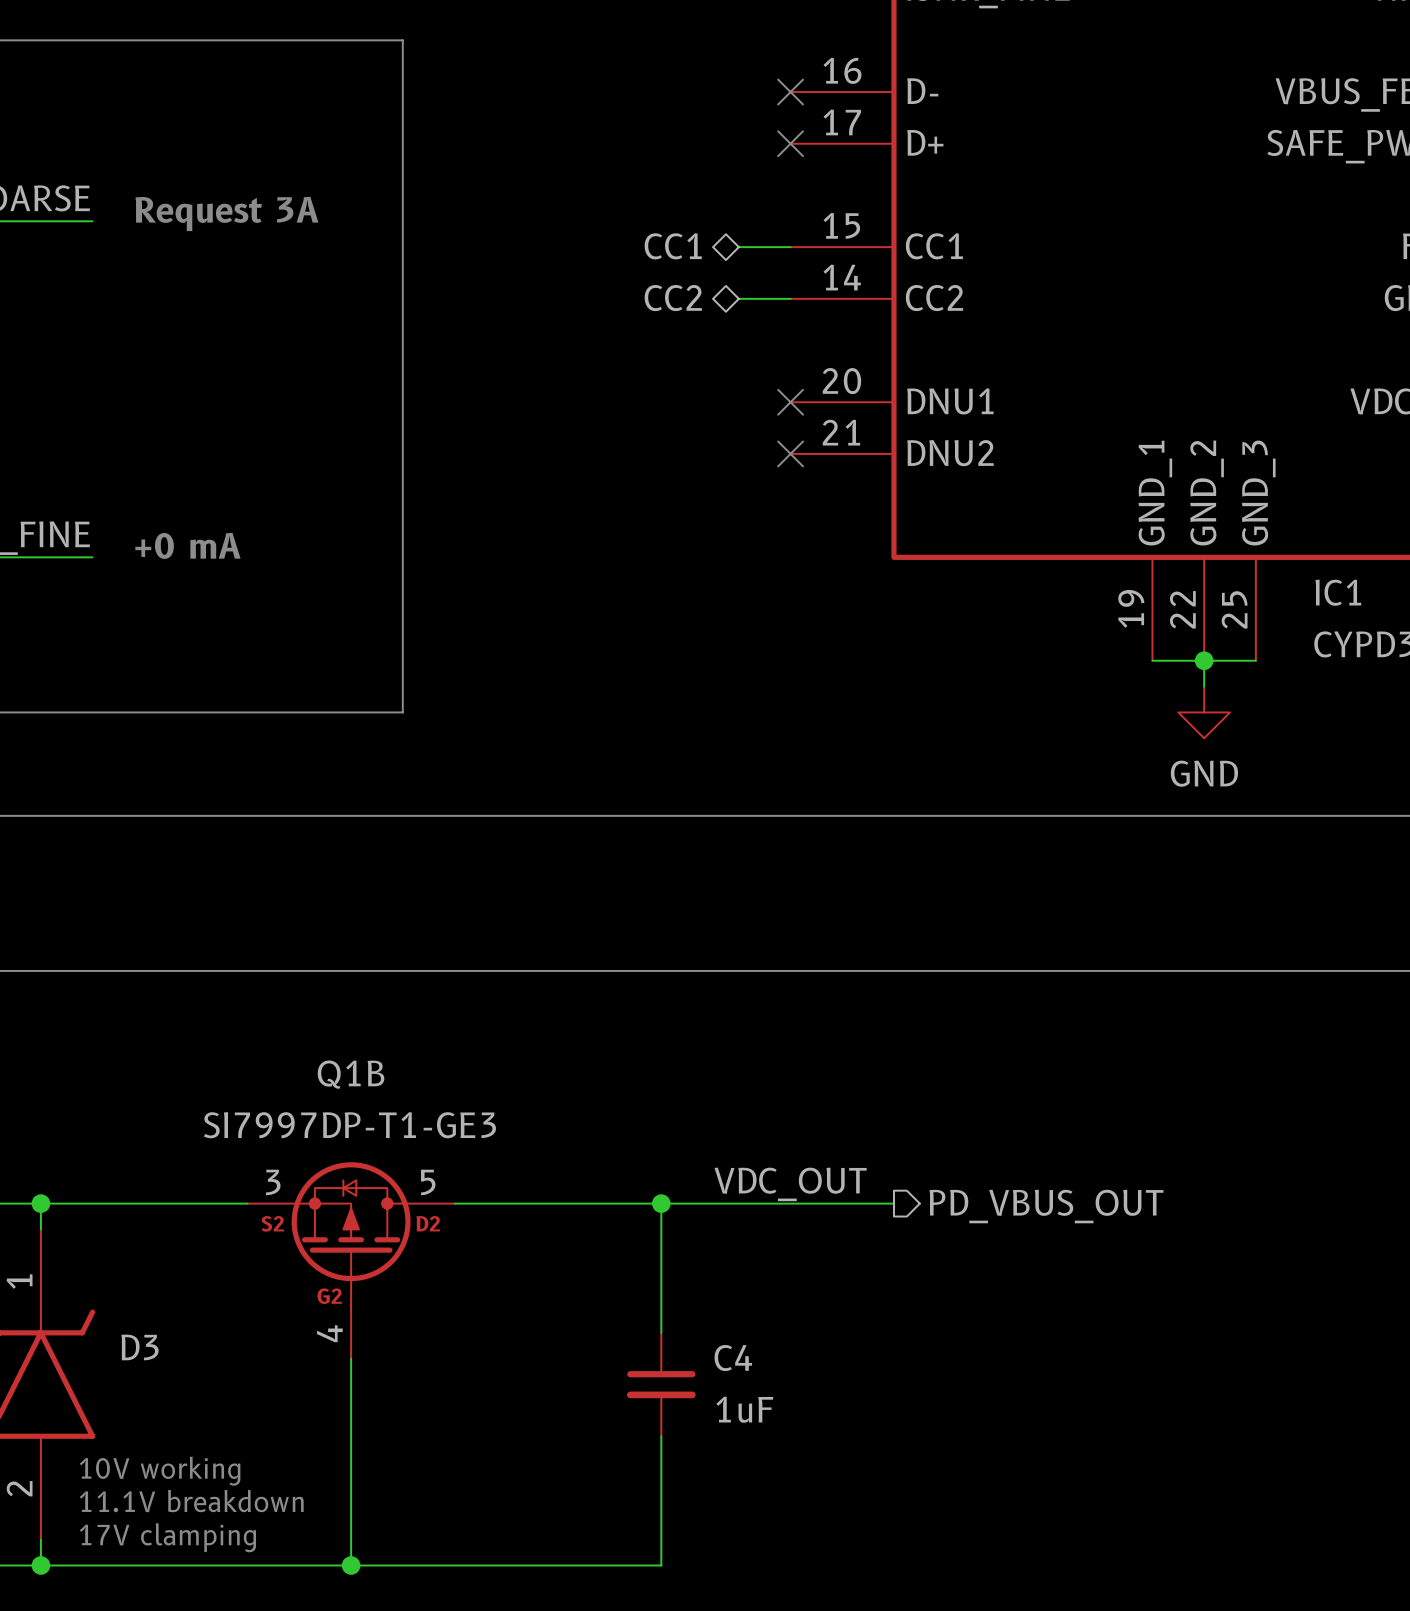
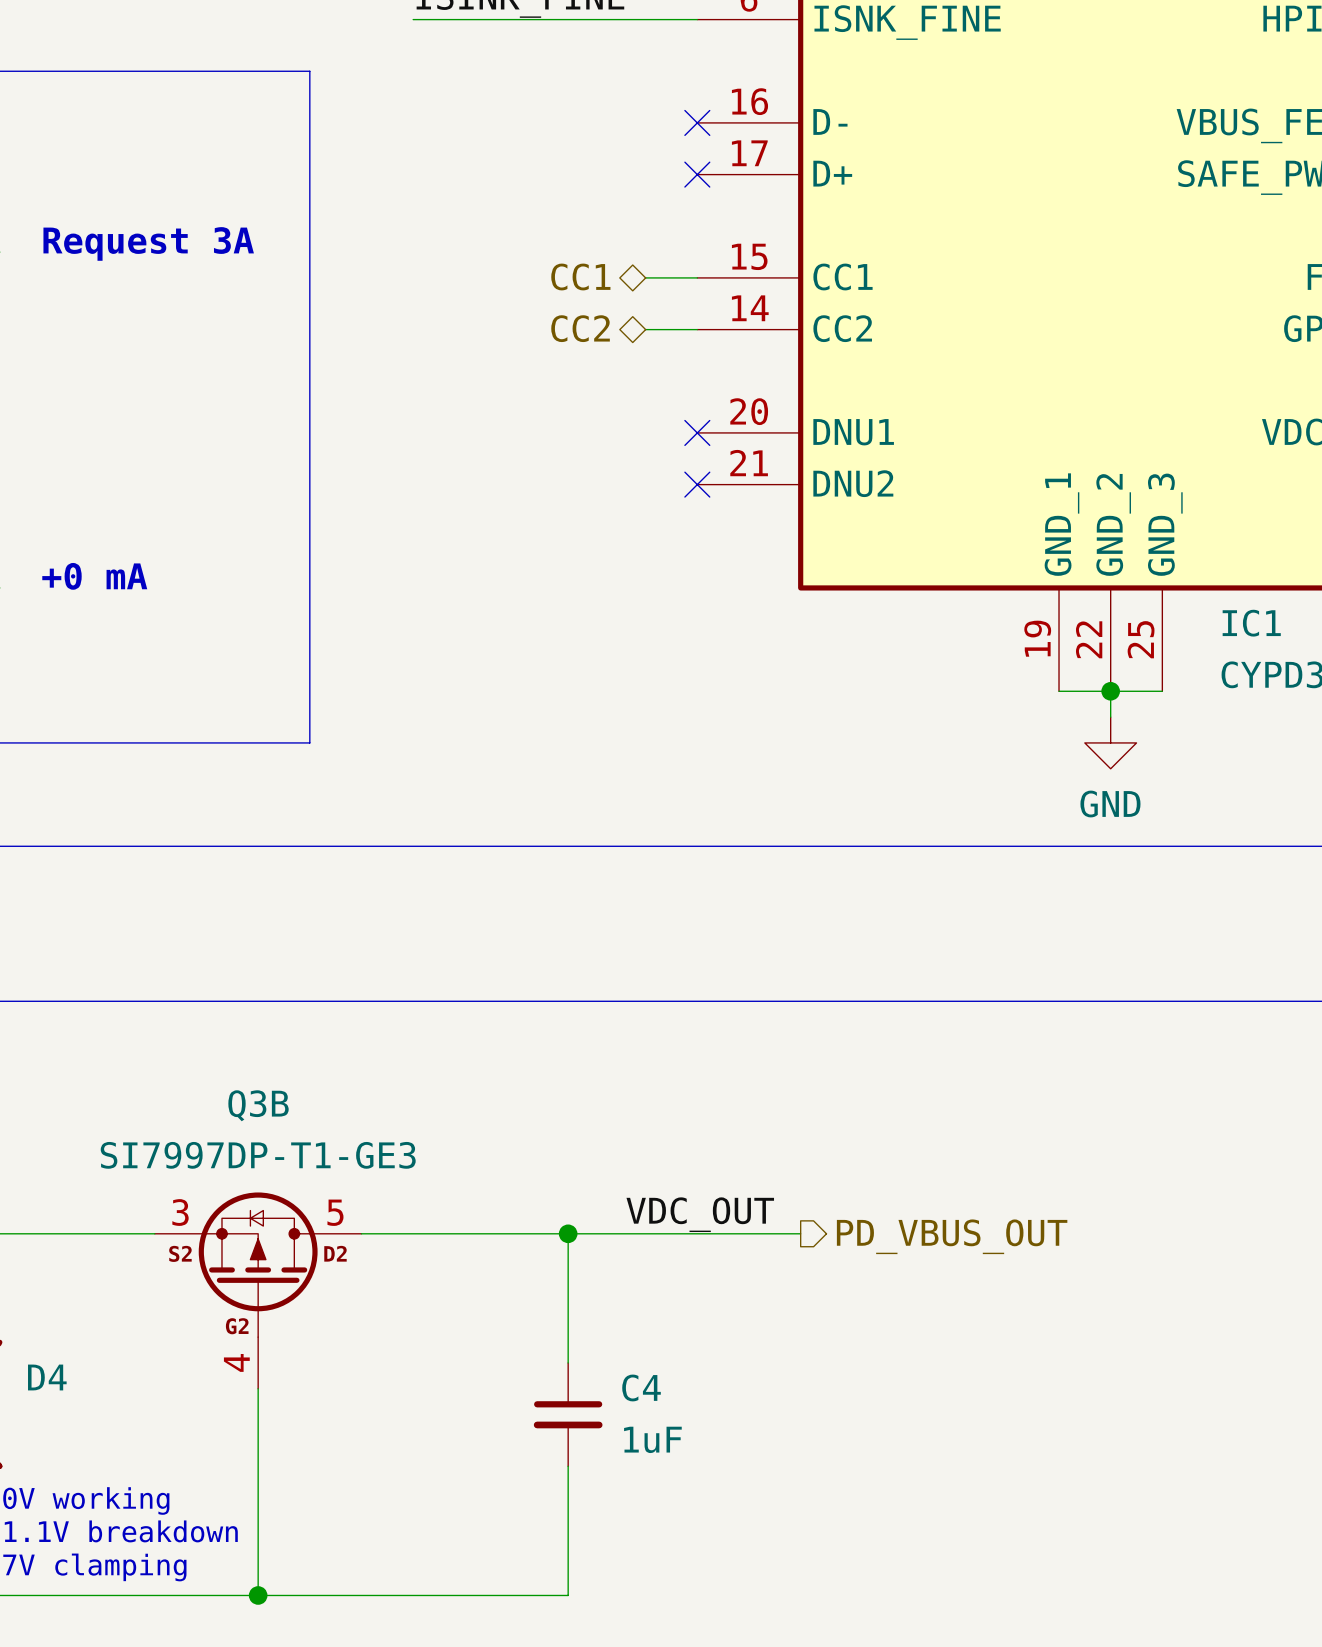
Q1B name: Q1B (351, 1074) -> Q3B (258, 1105)
D3 name: D3 (139, 1347) -> D4 (47, 1377)

